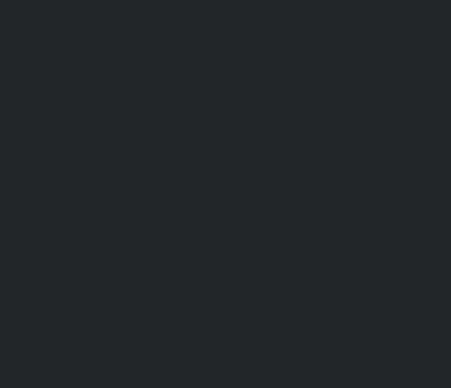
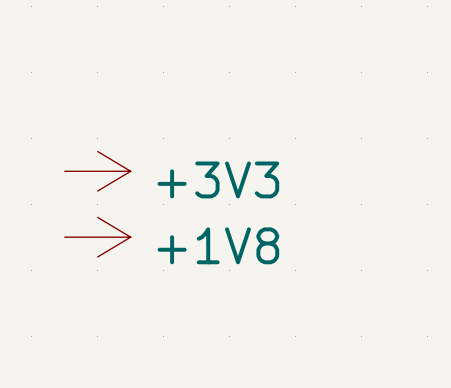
power symbol: none -> +3V3 (97, 171)
power symbol: none -> +1V8 (97, 237)

